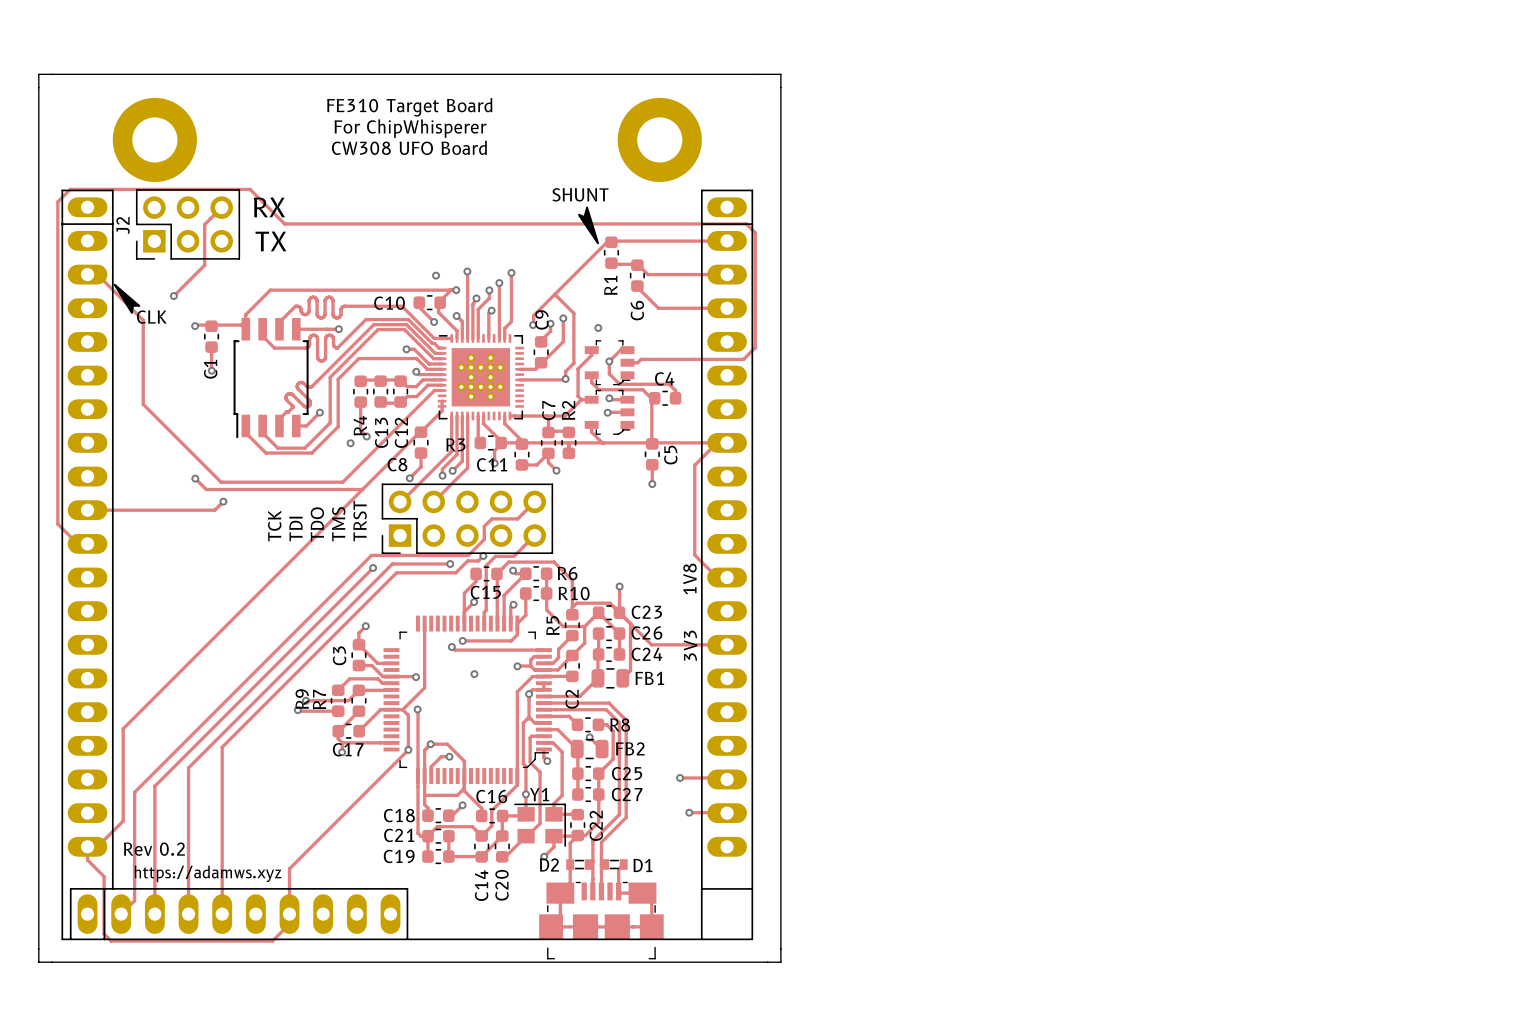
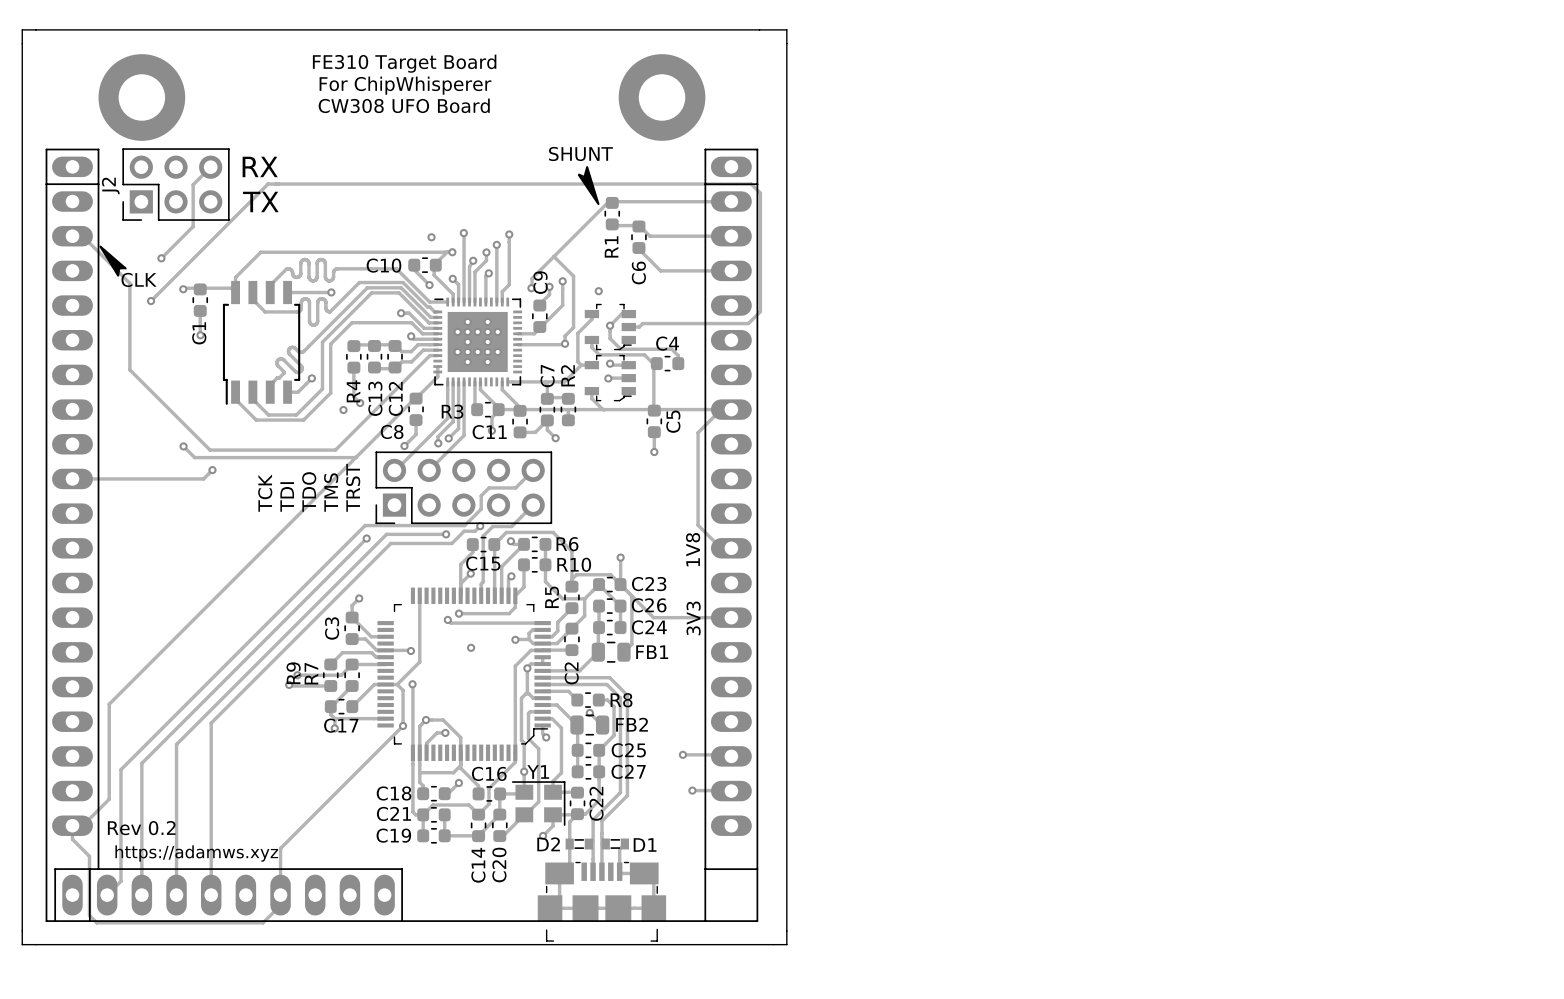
track: (284, 223) (250, 189) (70, 189) (57, 201) (57, 524) (77, 543) -> (275, 184) (268, 184) (151, 301)
via: none -> (151, 301)

